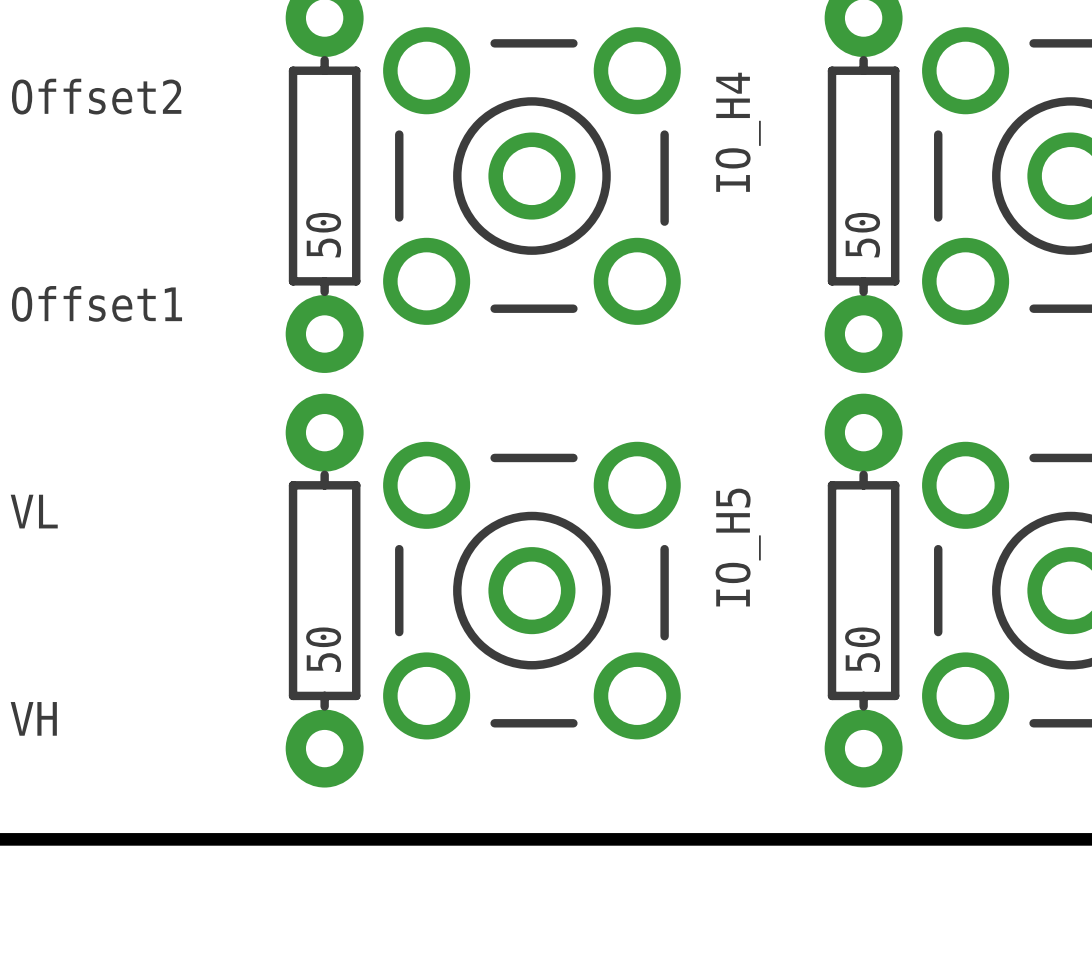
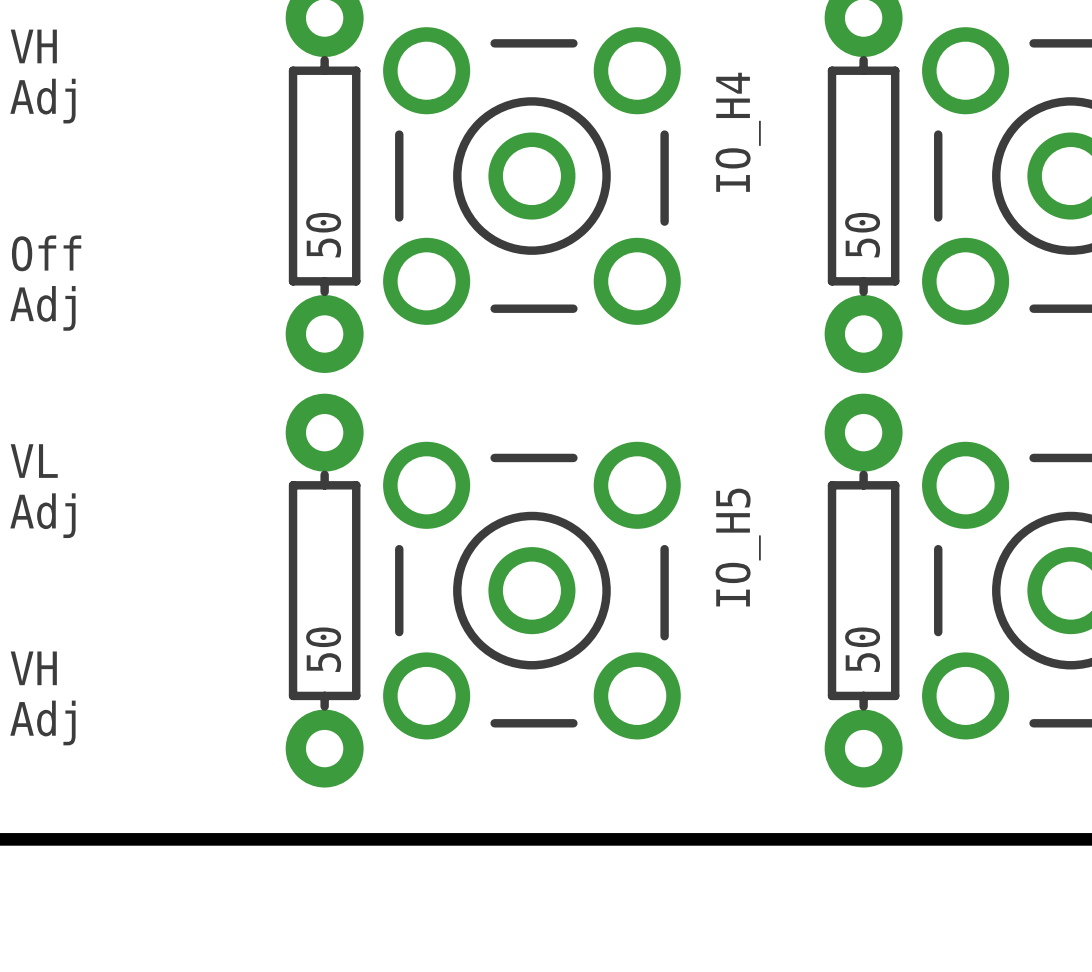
text: none -> VH (33, 46)
text: Offset2 (96, 96) -> Adj (42, 101)
text: none -> Off (46, 253)
text: Offset1 (96, 303) -> Adj (42, 308)
text: none -> VL (34, 461)
text: VL (34, 511) -> Adj (42, 515)
text: none -> VH (33, 668)
text: VH (33, 718) -> Adj (42, 722)

